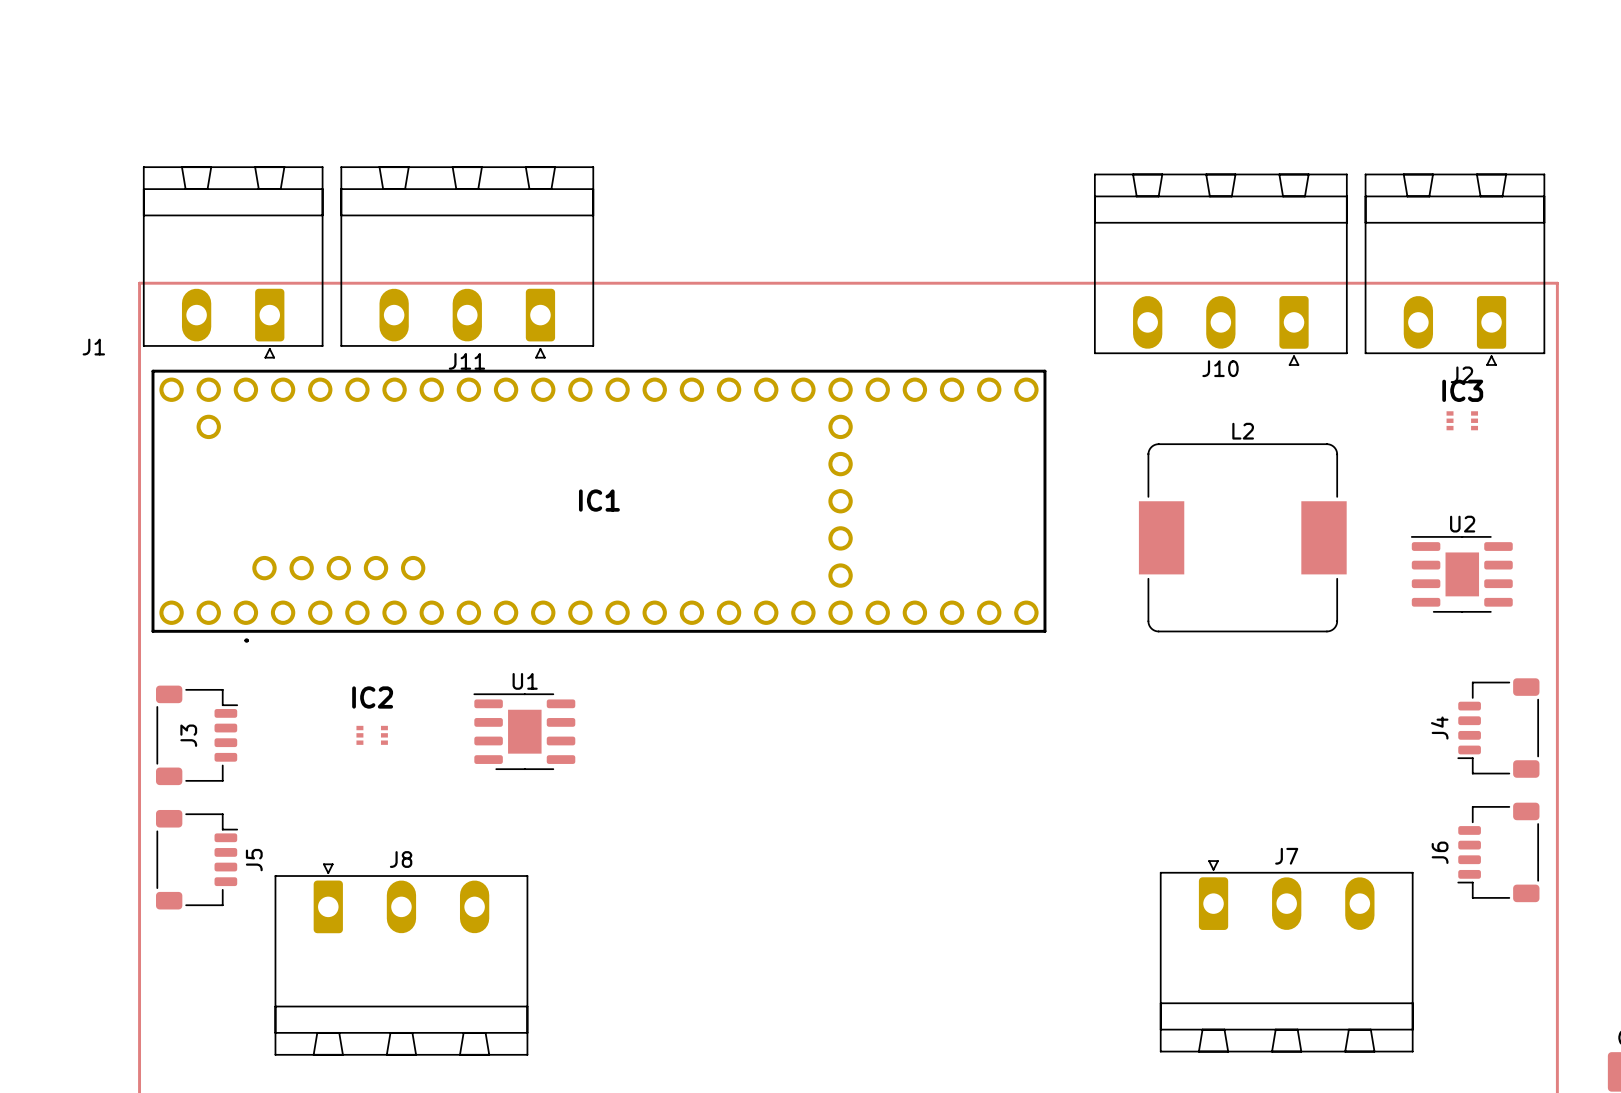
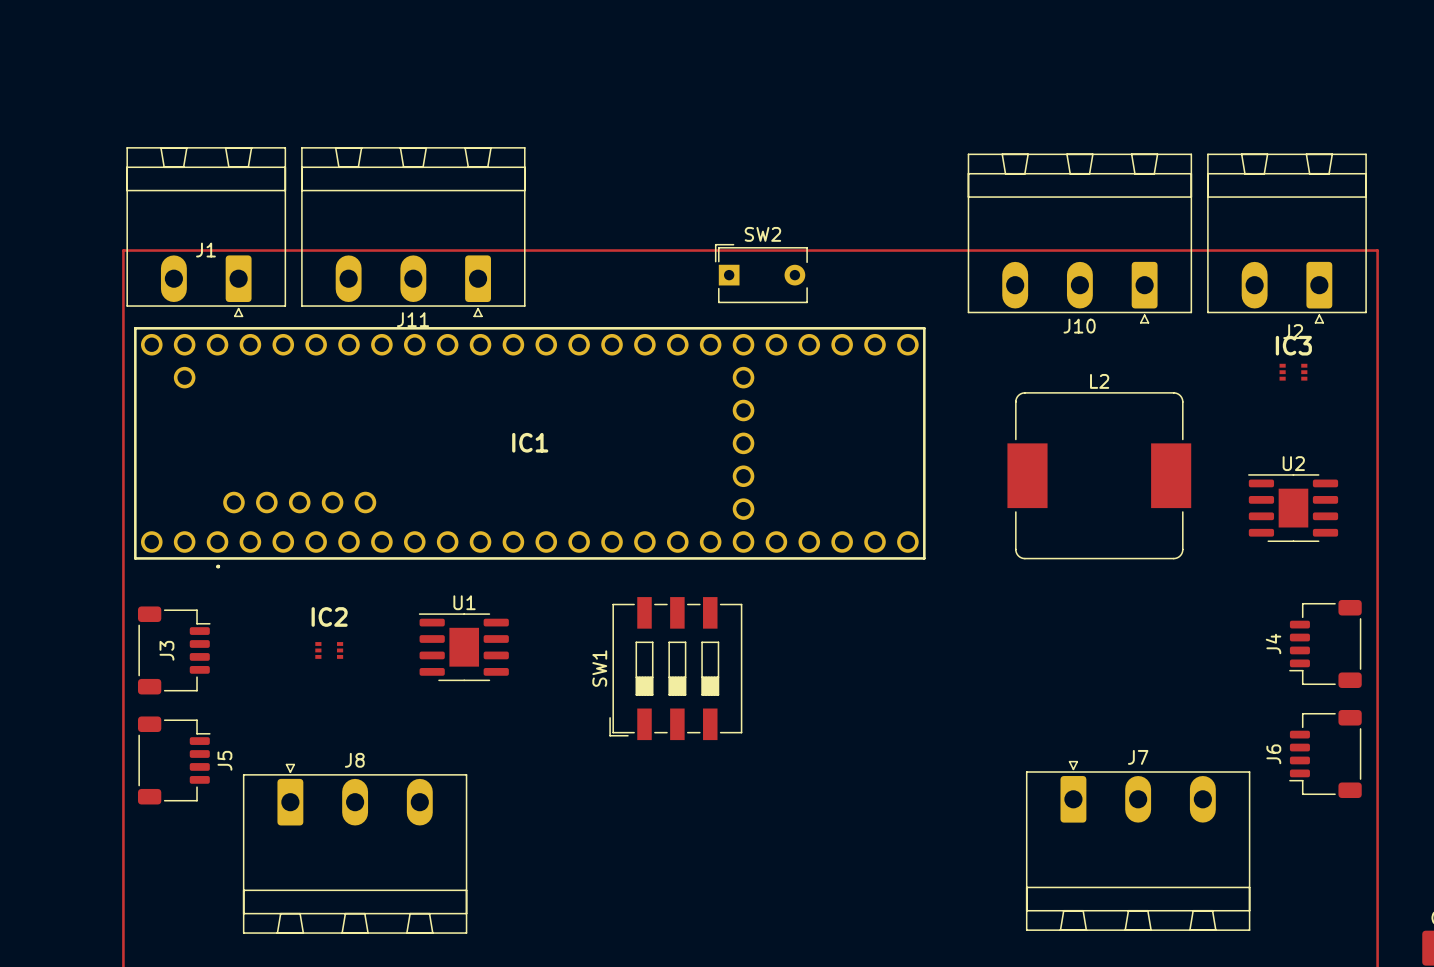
SW2: none -> (761, 273)
J1 name position: J1 (93, 347) -> J1 (205, 250)
SW1: none -> (675, 668)

